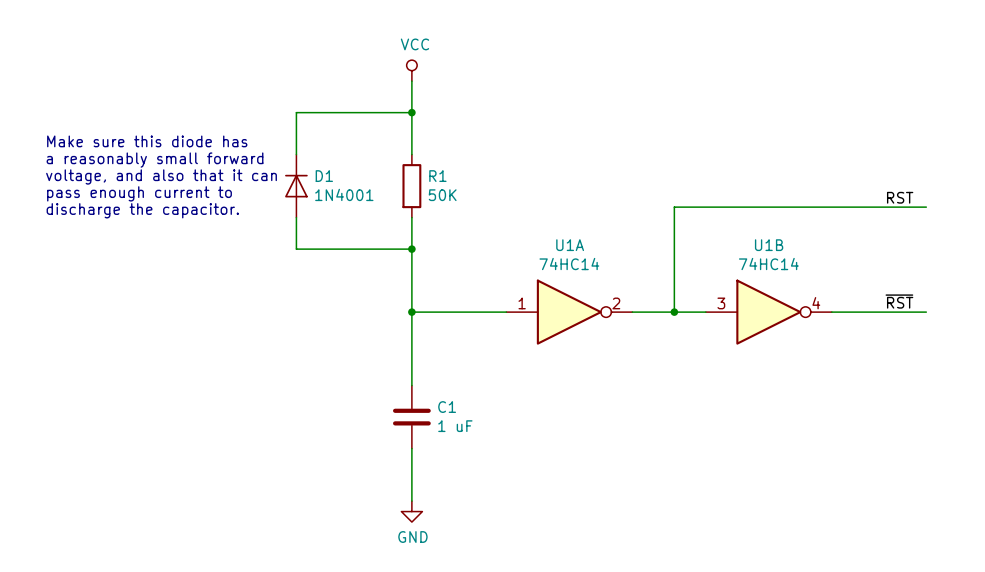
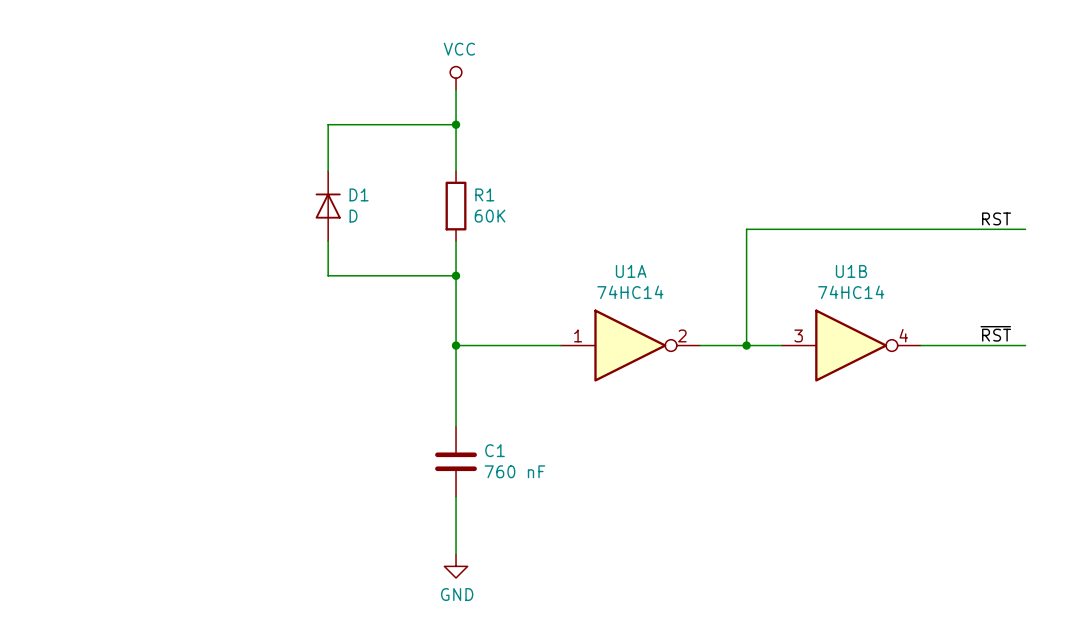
text: Make sure this diode has (147, 141) -> none
text: a reasonably small forward (155, 160) -> none
text: voltage, and also that it can (161, 176) -> none
text: pass enough current to (139, 193) -> none
D1 value: 1N4001 (344, 194) -> D (353, 216)
R1 value: 50K (442, 195) -> 60K (490, 216)
text: discharge the capacitor. (142, 210) -> none
C1 value: 1 uF (455, 426) -> 760 nF (514, 471)

